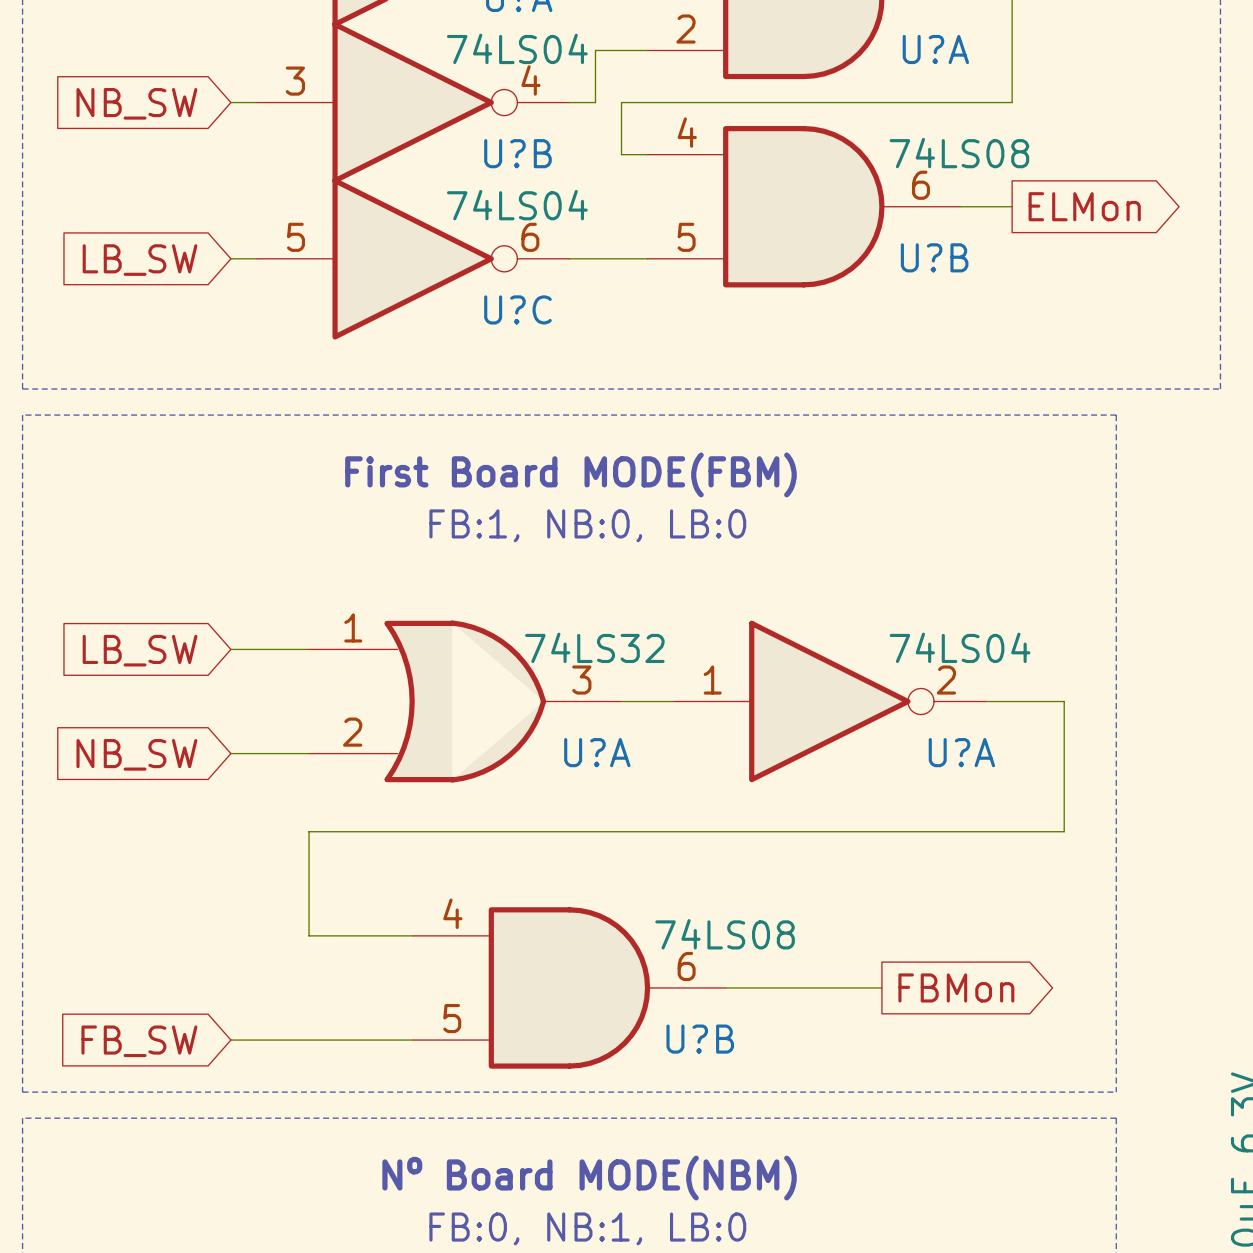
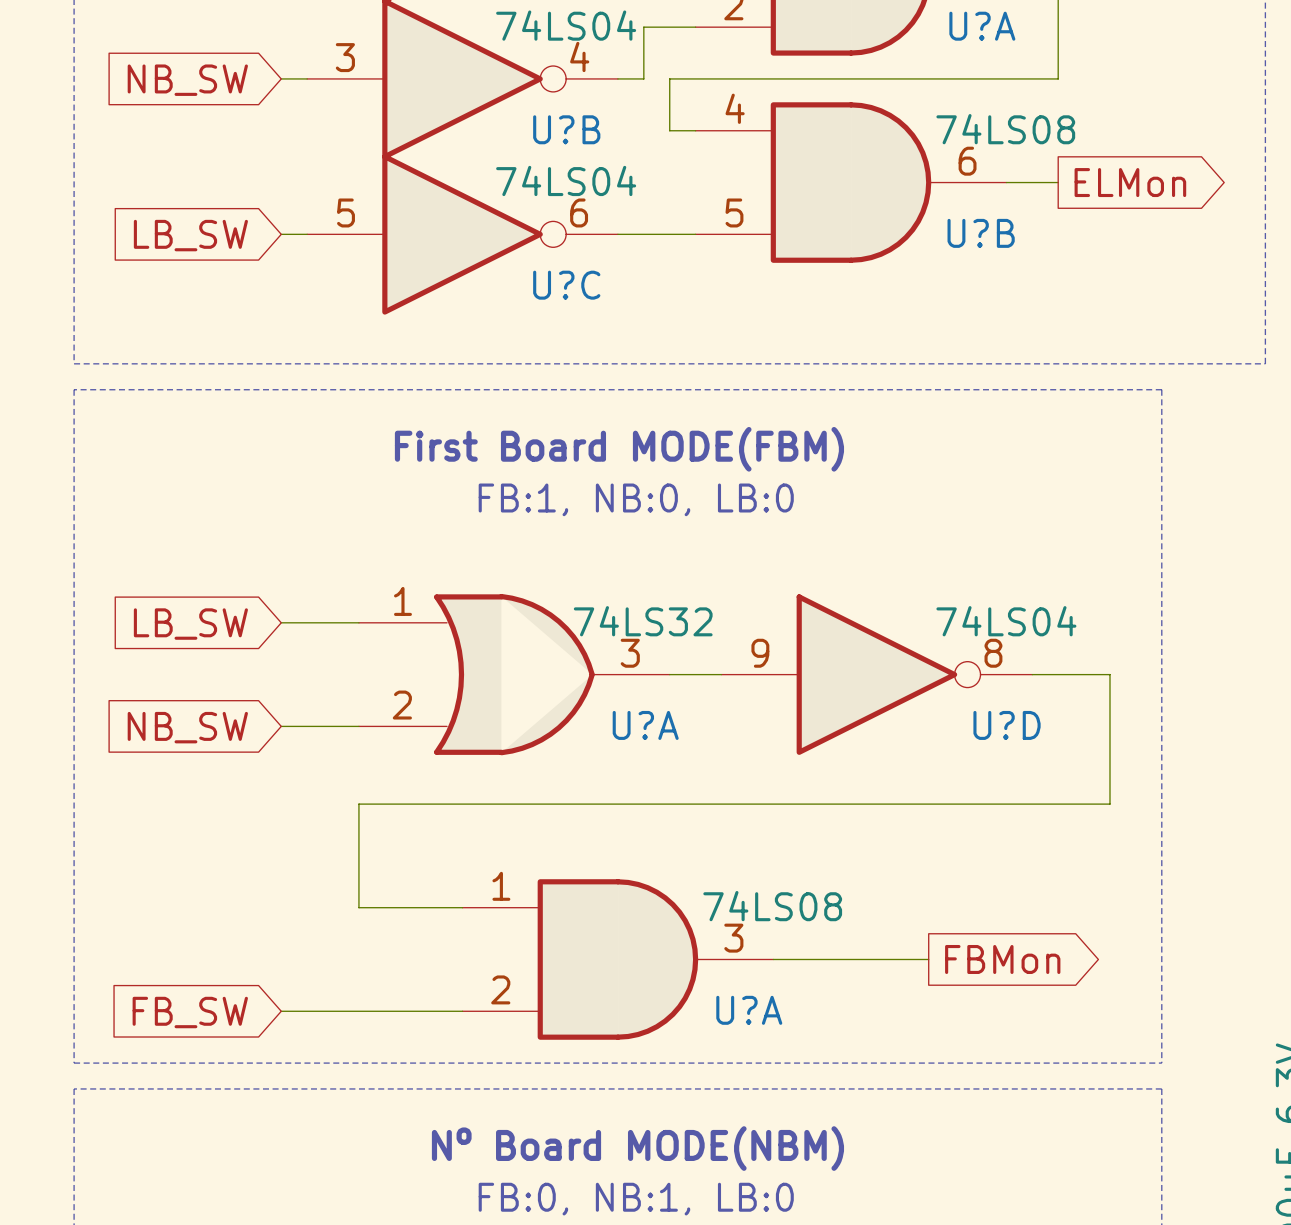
U?A pin number: 1 (712, 680) -> 9 (760, 653)
U?A pin number: 2 (946, 680) -> 8 (993, 653)
U?A name: U?A (961, 752) -> U?D (1007, 725)
U?B pin number: 4 (452, 913) -> 1 (501, 886)
U?B pin number: 6 (686, 966) -> 3 (733, 938)
U?B pin number: 5 (452, 1018) -> 2 (500, 989)
U?B name: U?B (700, 1039) -> U?A (749, 1010)

